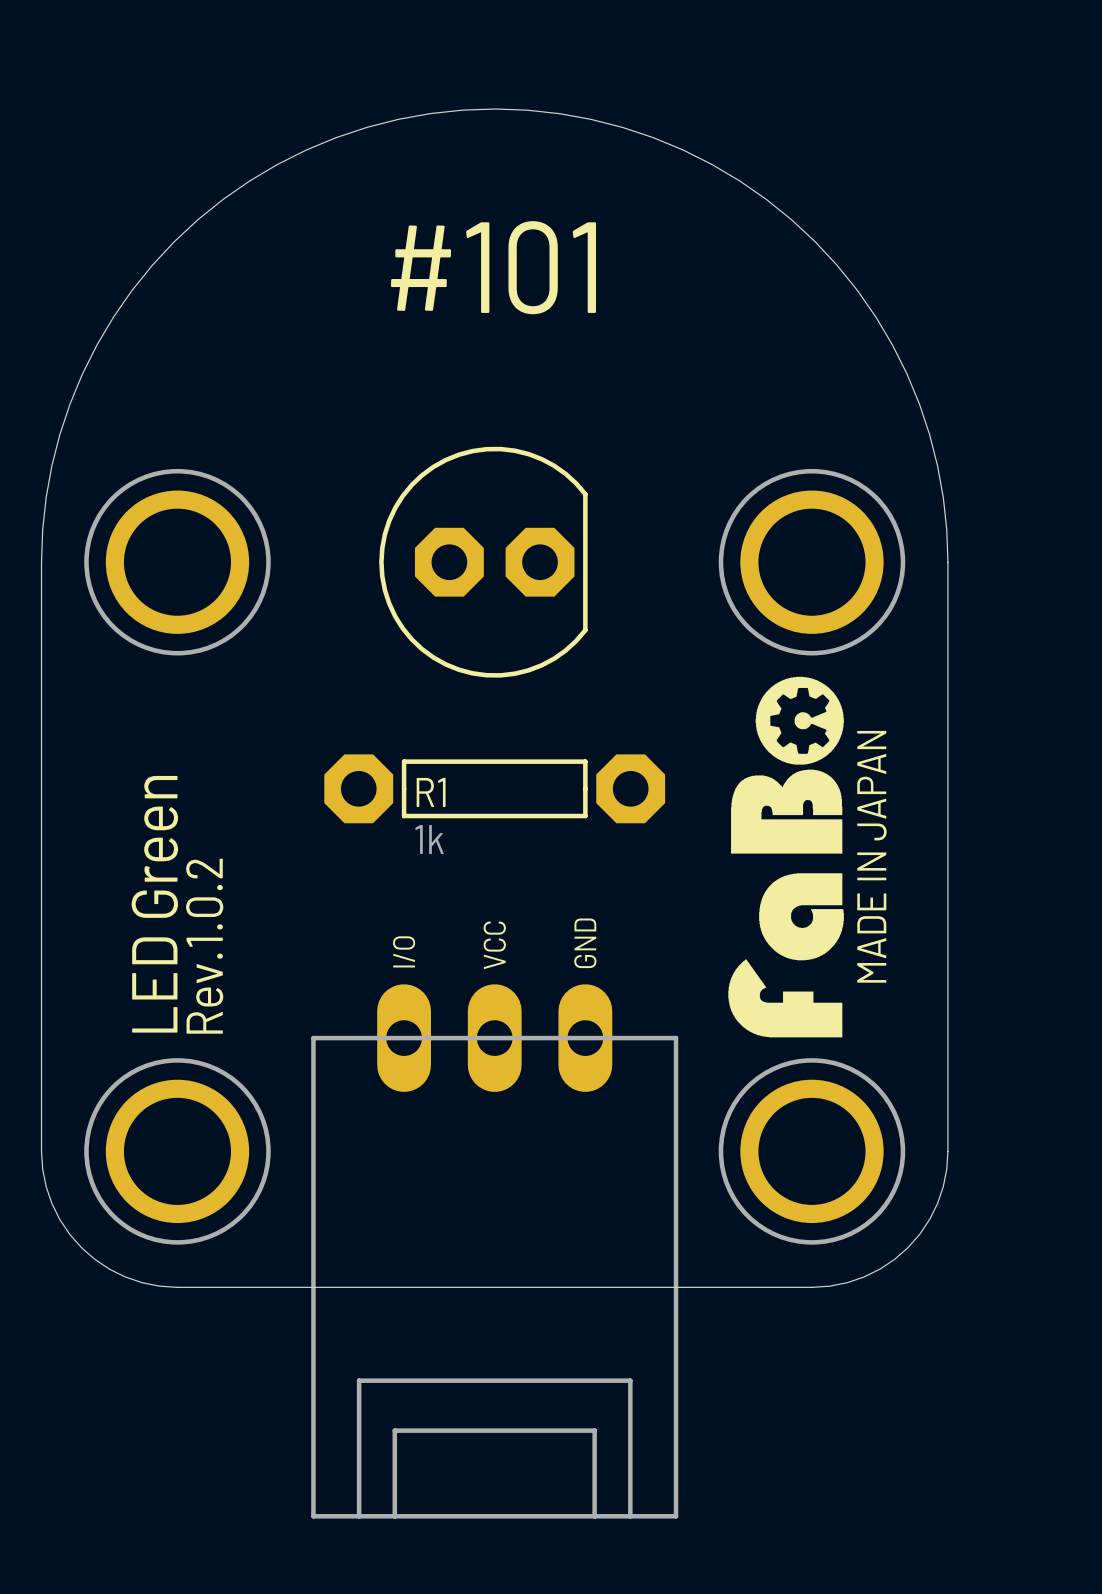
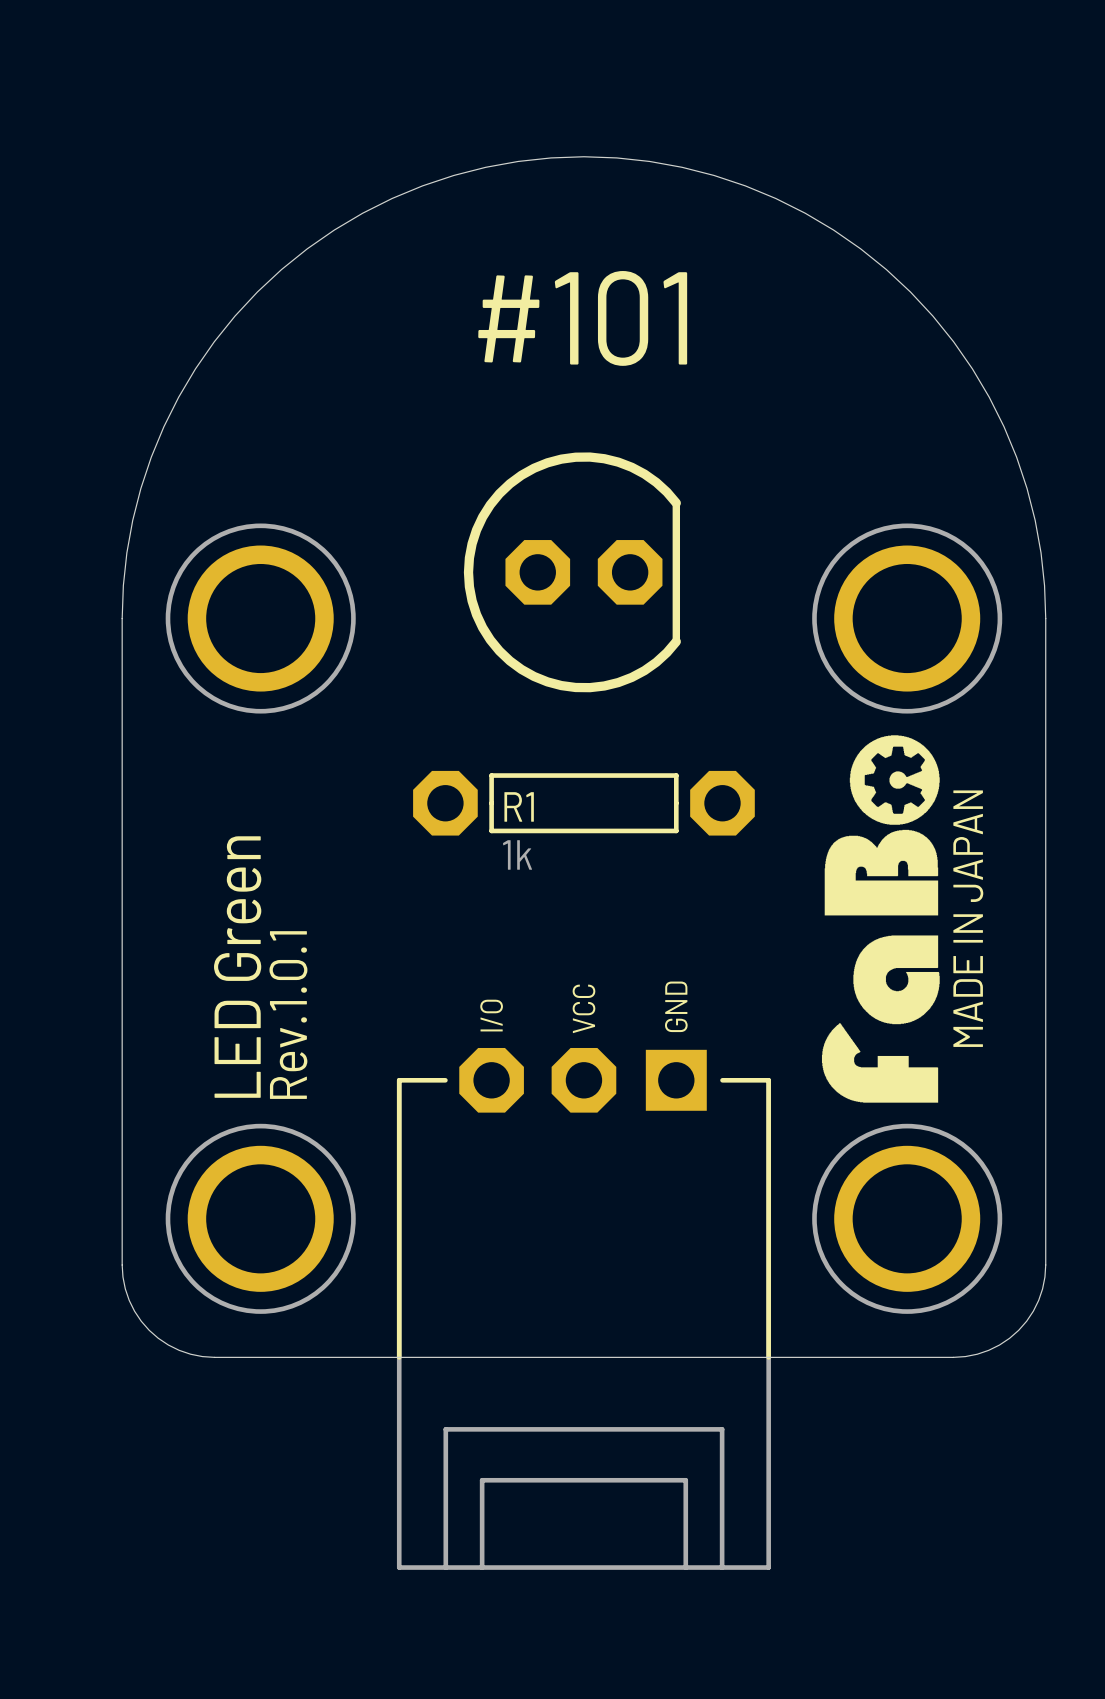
part footprint: [41, 109, 948, 1519] -> [122, 156, 1046, 1570]
part: none -> (572, 572)
part: (483, 562) -> none
R1 footprint: [324, 754, 666, 824] -> [413, 770, 755, 836]
text: Rev.1.0.2 (204, 946) -> Rev.1.0.1 (288, 1015)

